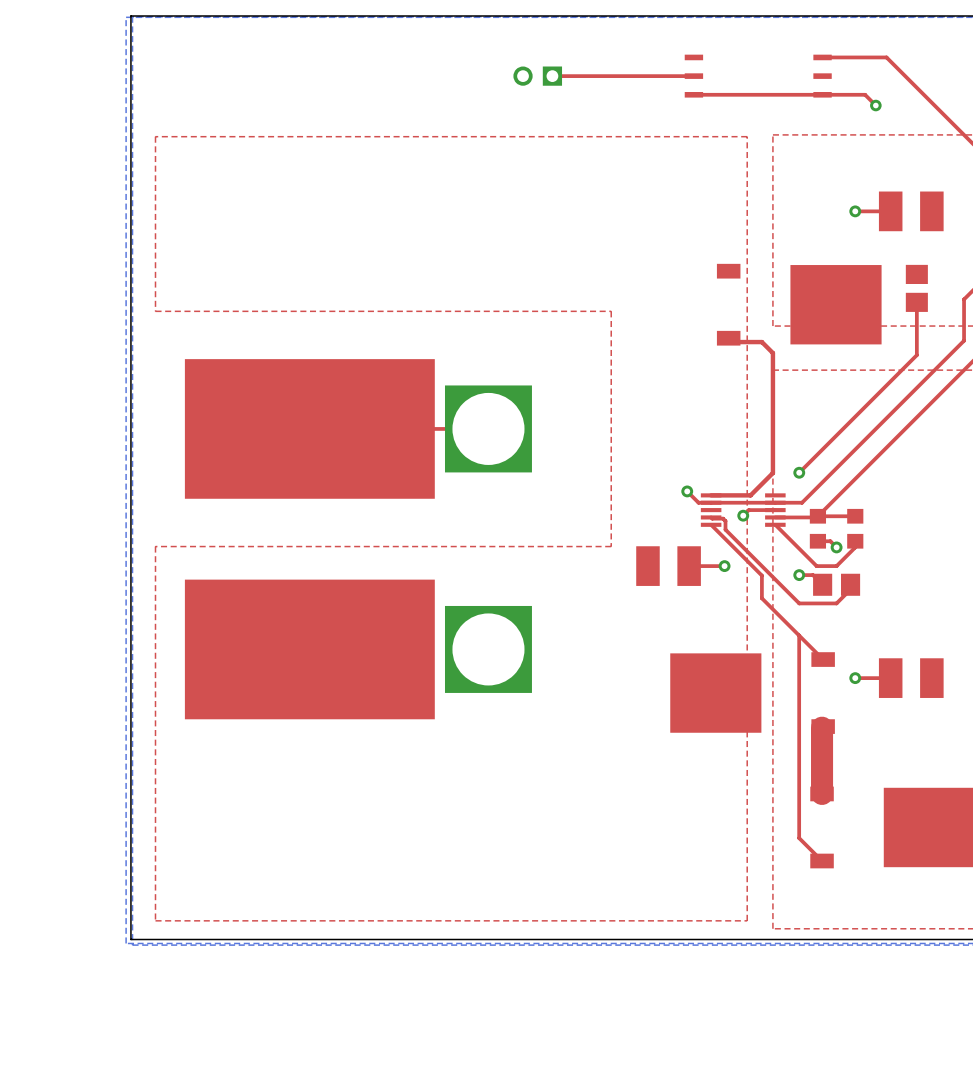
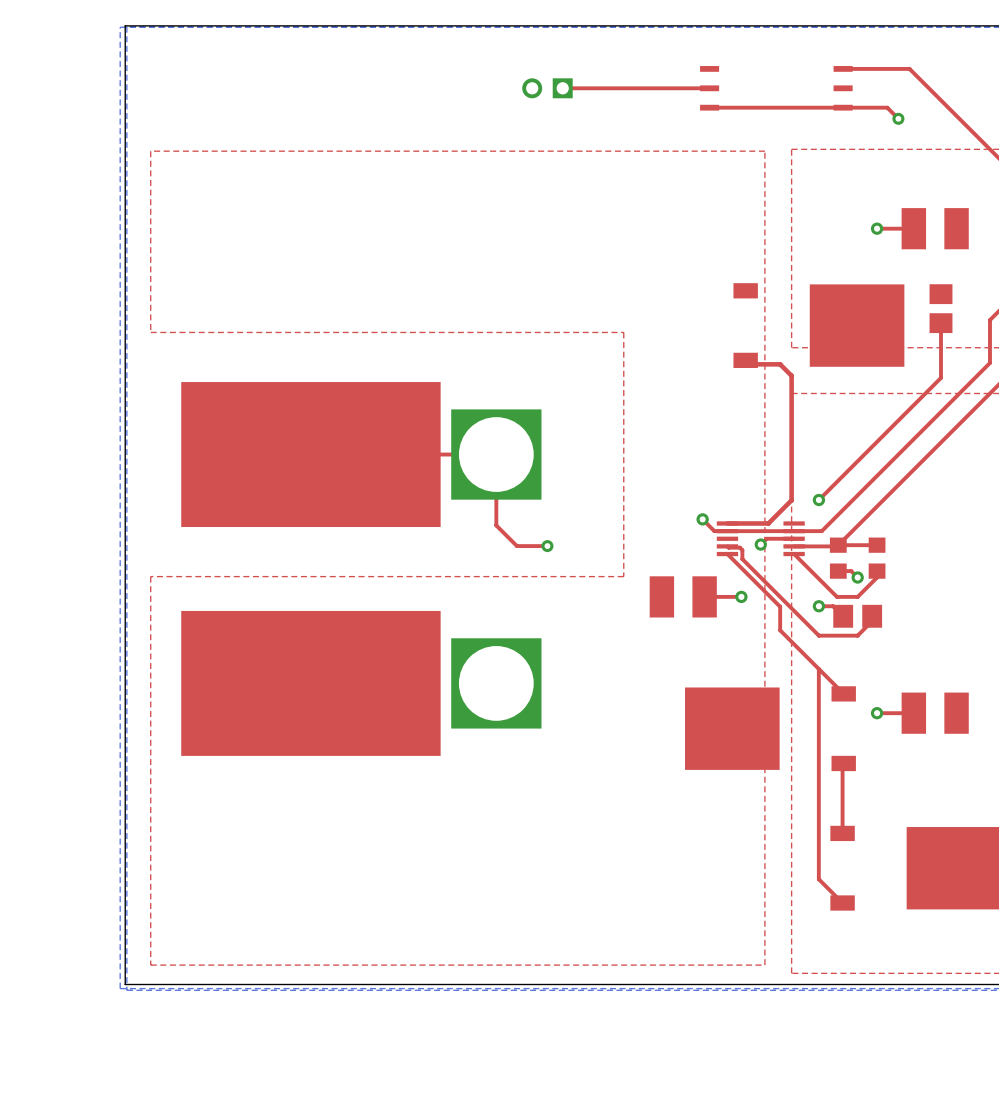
top track: none -> (496, 454) (496, 525) (516, 546) (547, 546)
via: none -> (547, 546)
top track width: thick (822, 727) (822, 793) -> thin (842, 764) (842, 833)

